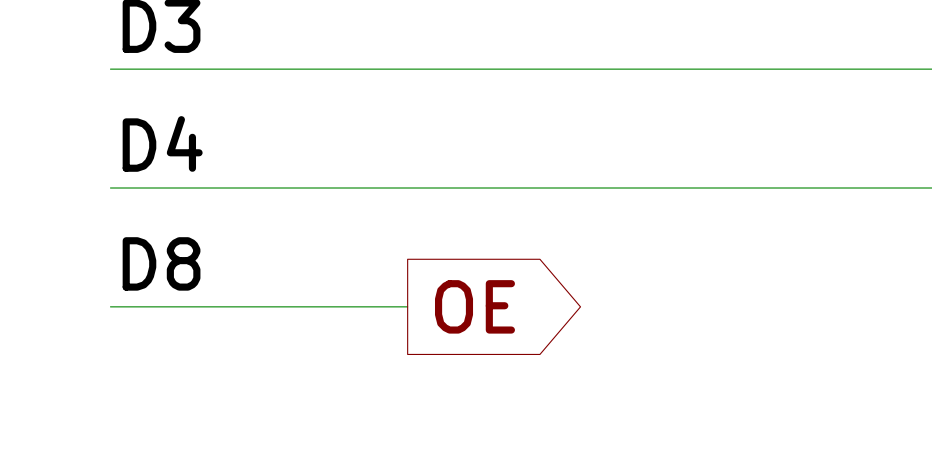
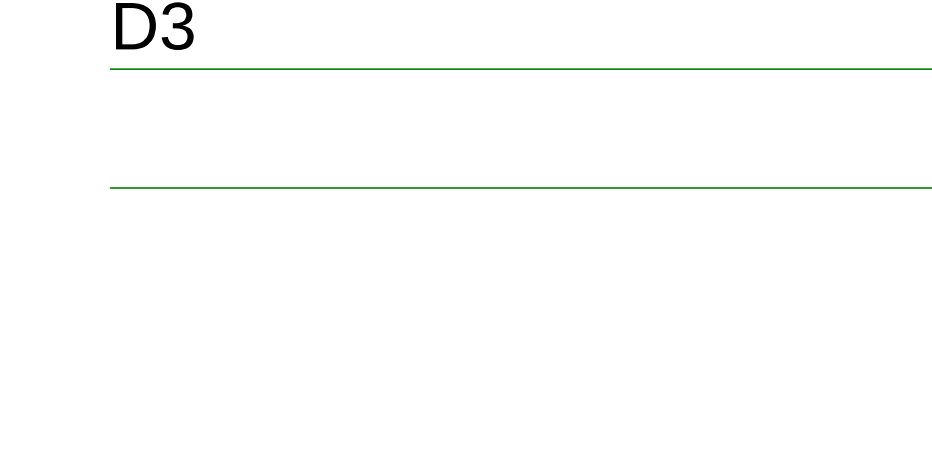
label: D4 (162, 143) -> none
label: D8 (161, 263) -> none
wire: (110, 306) (407, 306) -> none
global label: OE (474, 306) -> none

